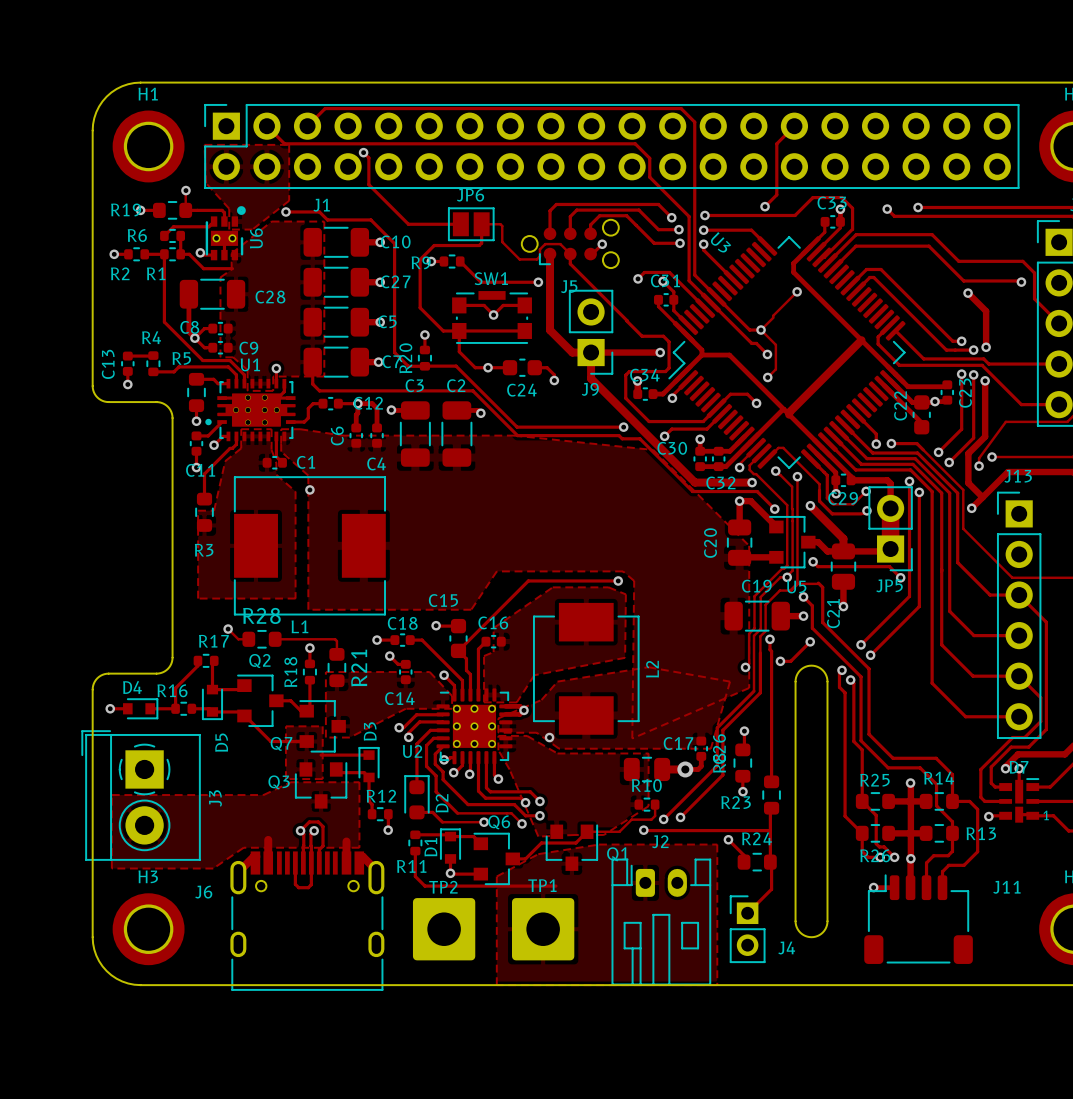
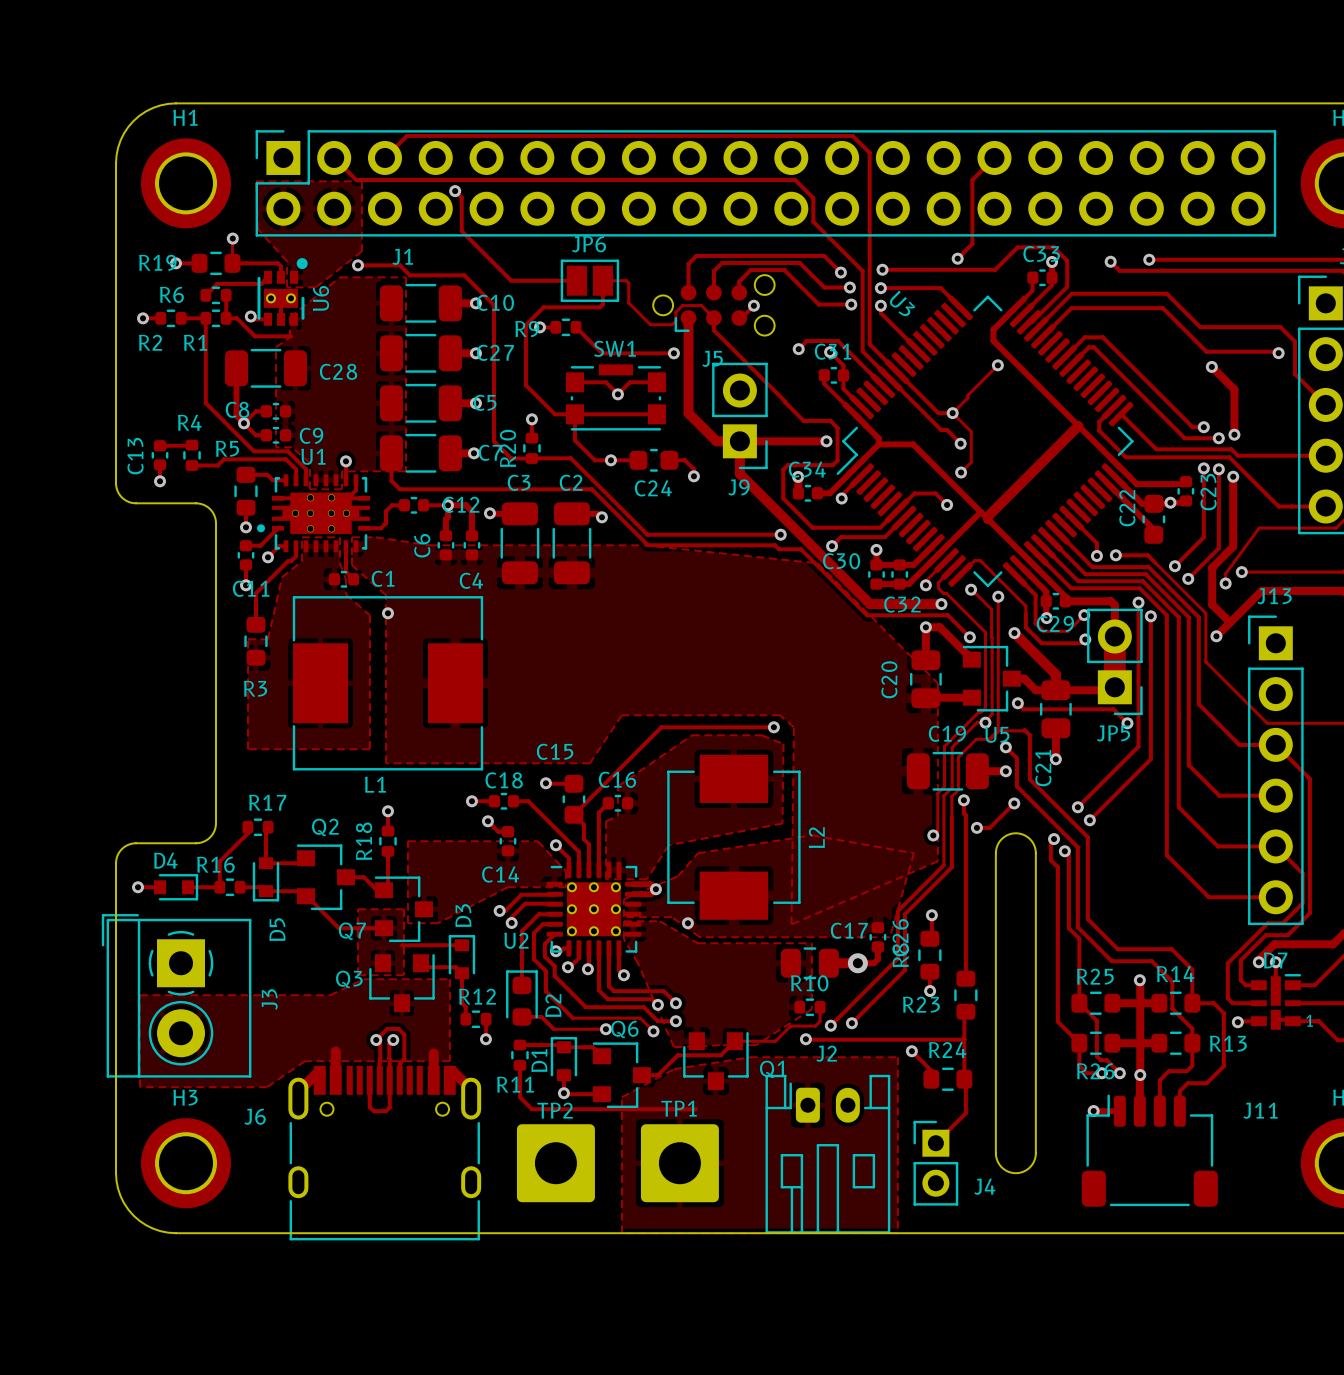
track: (228, 629) (238, 639) (248, 639) -> none
via: (228, 629) -> none
R28: (262, 639) -> none
track: (275, 639) (335, 639) (336, 641) (336, 654) -> none
R21: (336, 667) -> none

